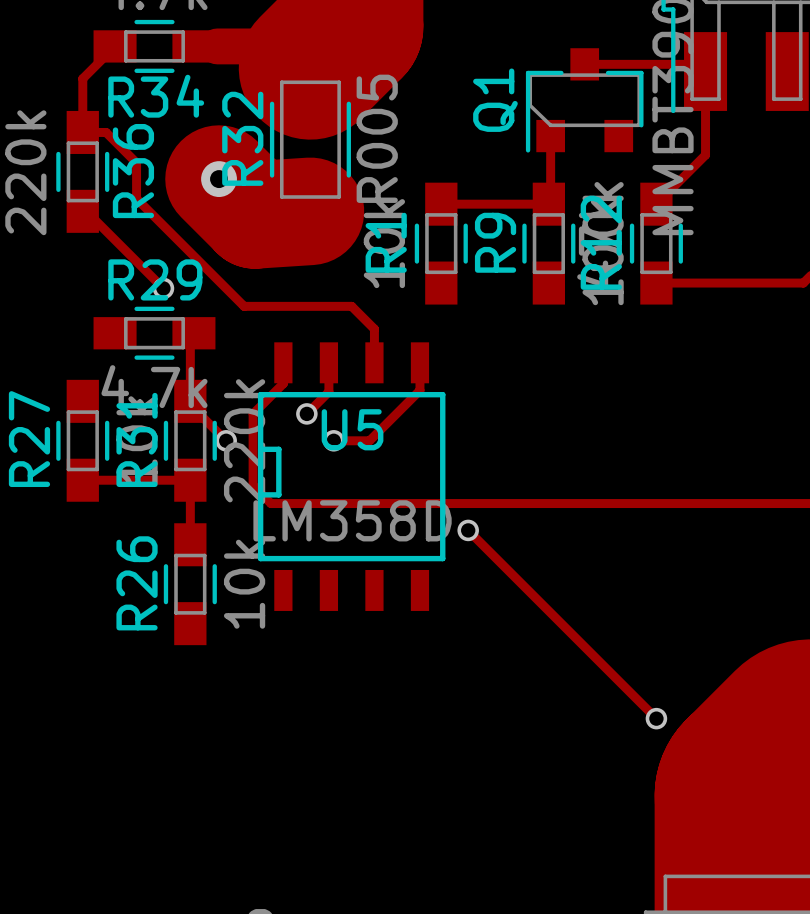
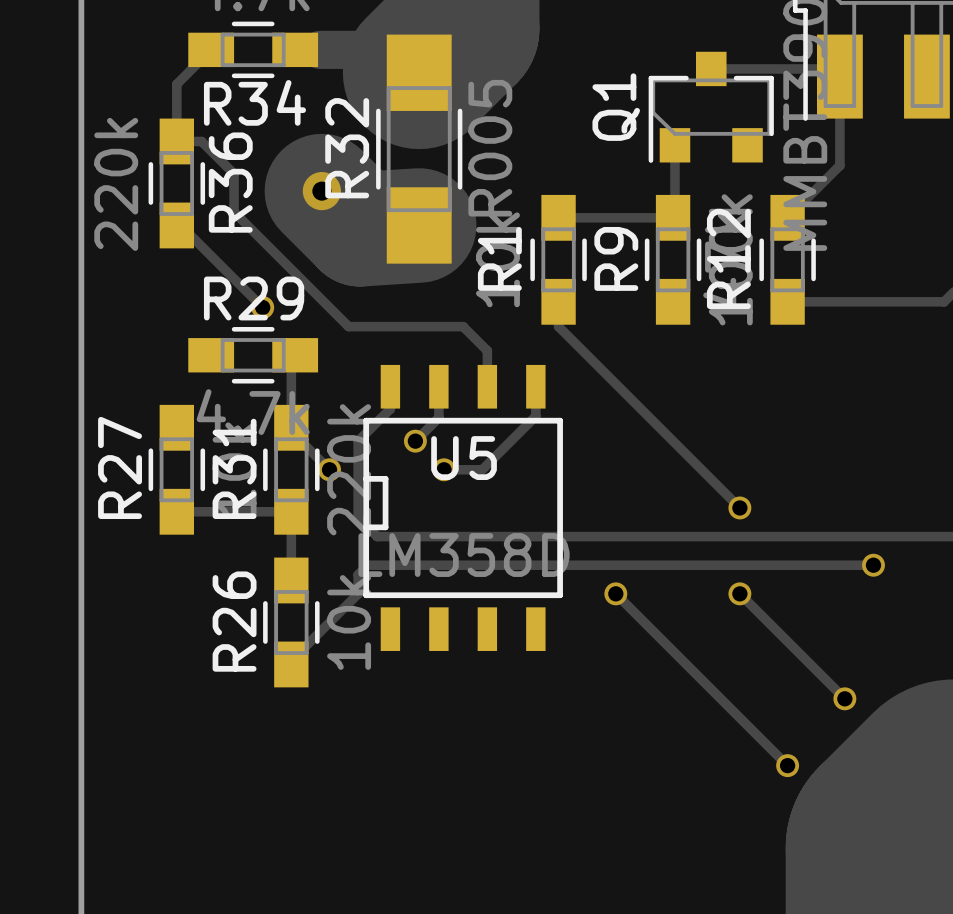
track: none -> (558, 301) (558, 326) (739, 507)
via: none -> (739, 507)
track: (468, 530) (495, 557) -> none
via position: (468, 530) -> (615, 593)
track: none -> (873, 565) (367, 565) (358, 574) (358, 593) (291, 660) (291, 664)
via: none -> (873, 565)
track: none -> (739, 593) (844, 698)
via: none -> (739, 593)
via: none -> (844, 698)

